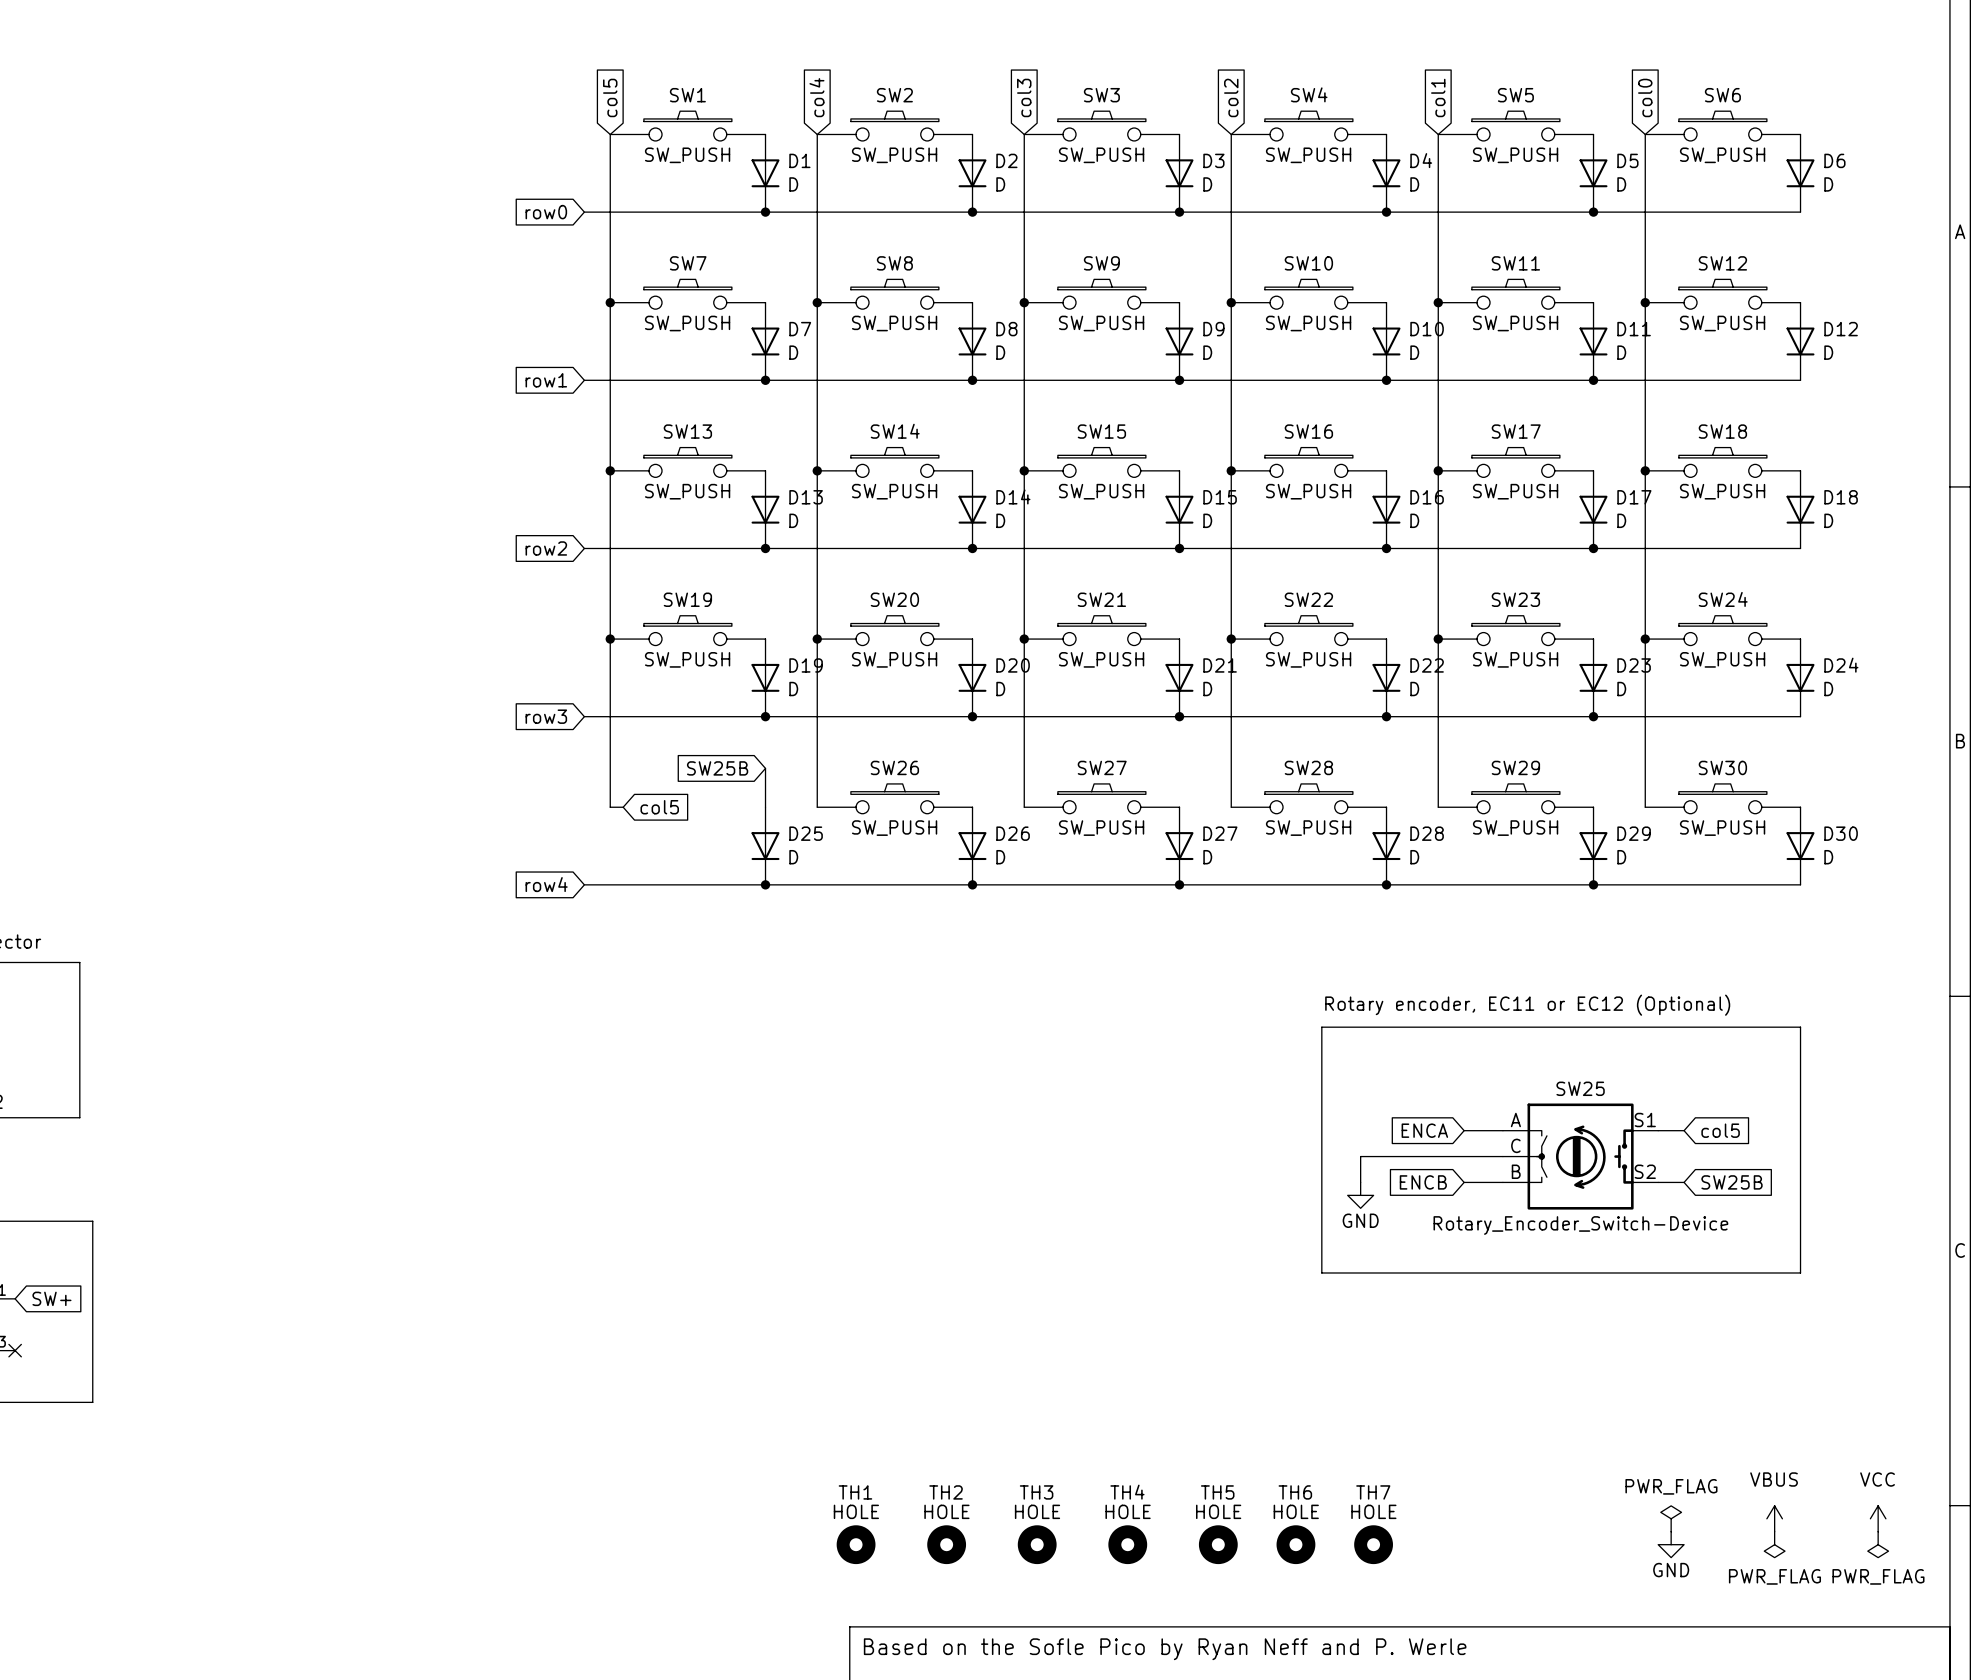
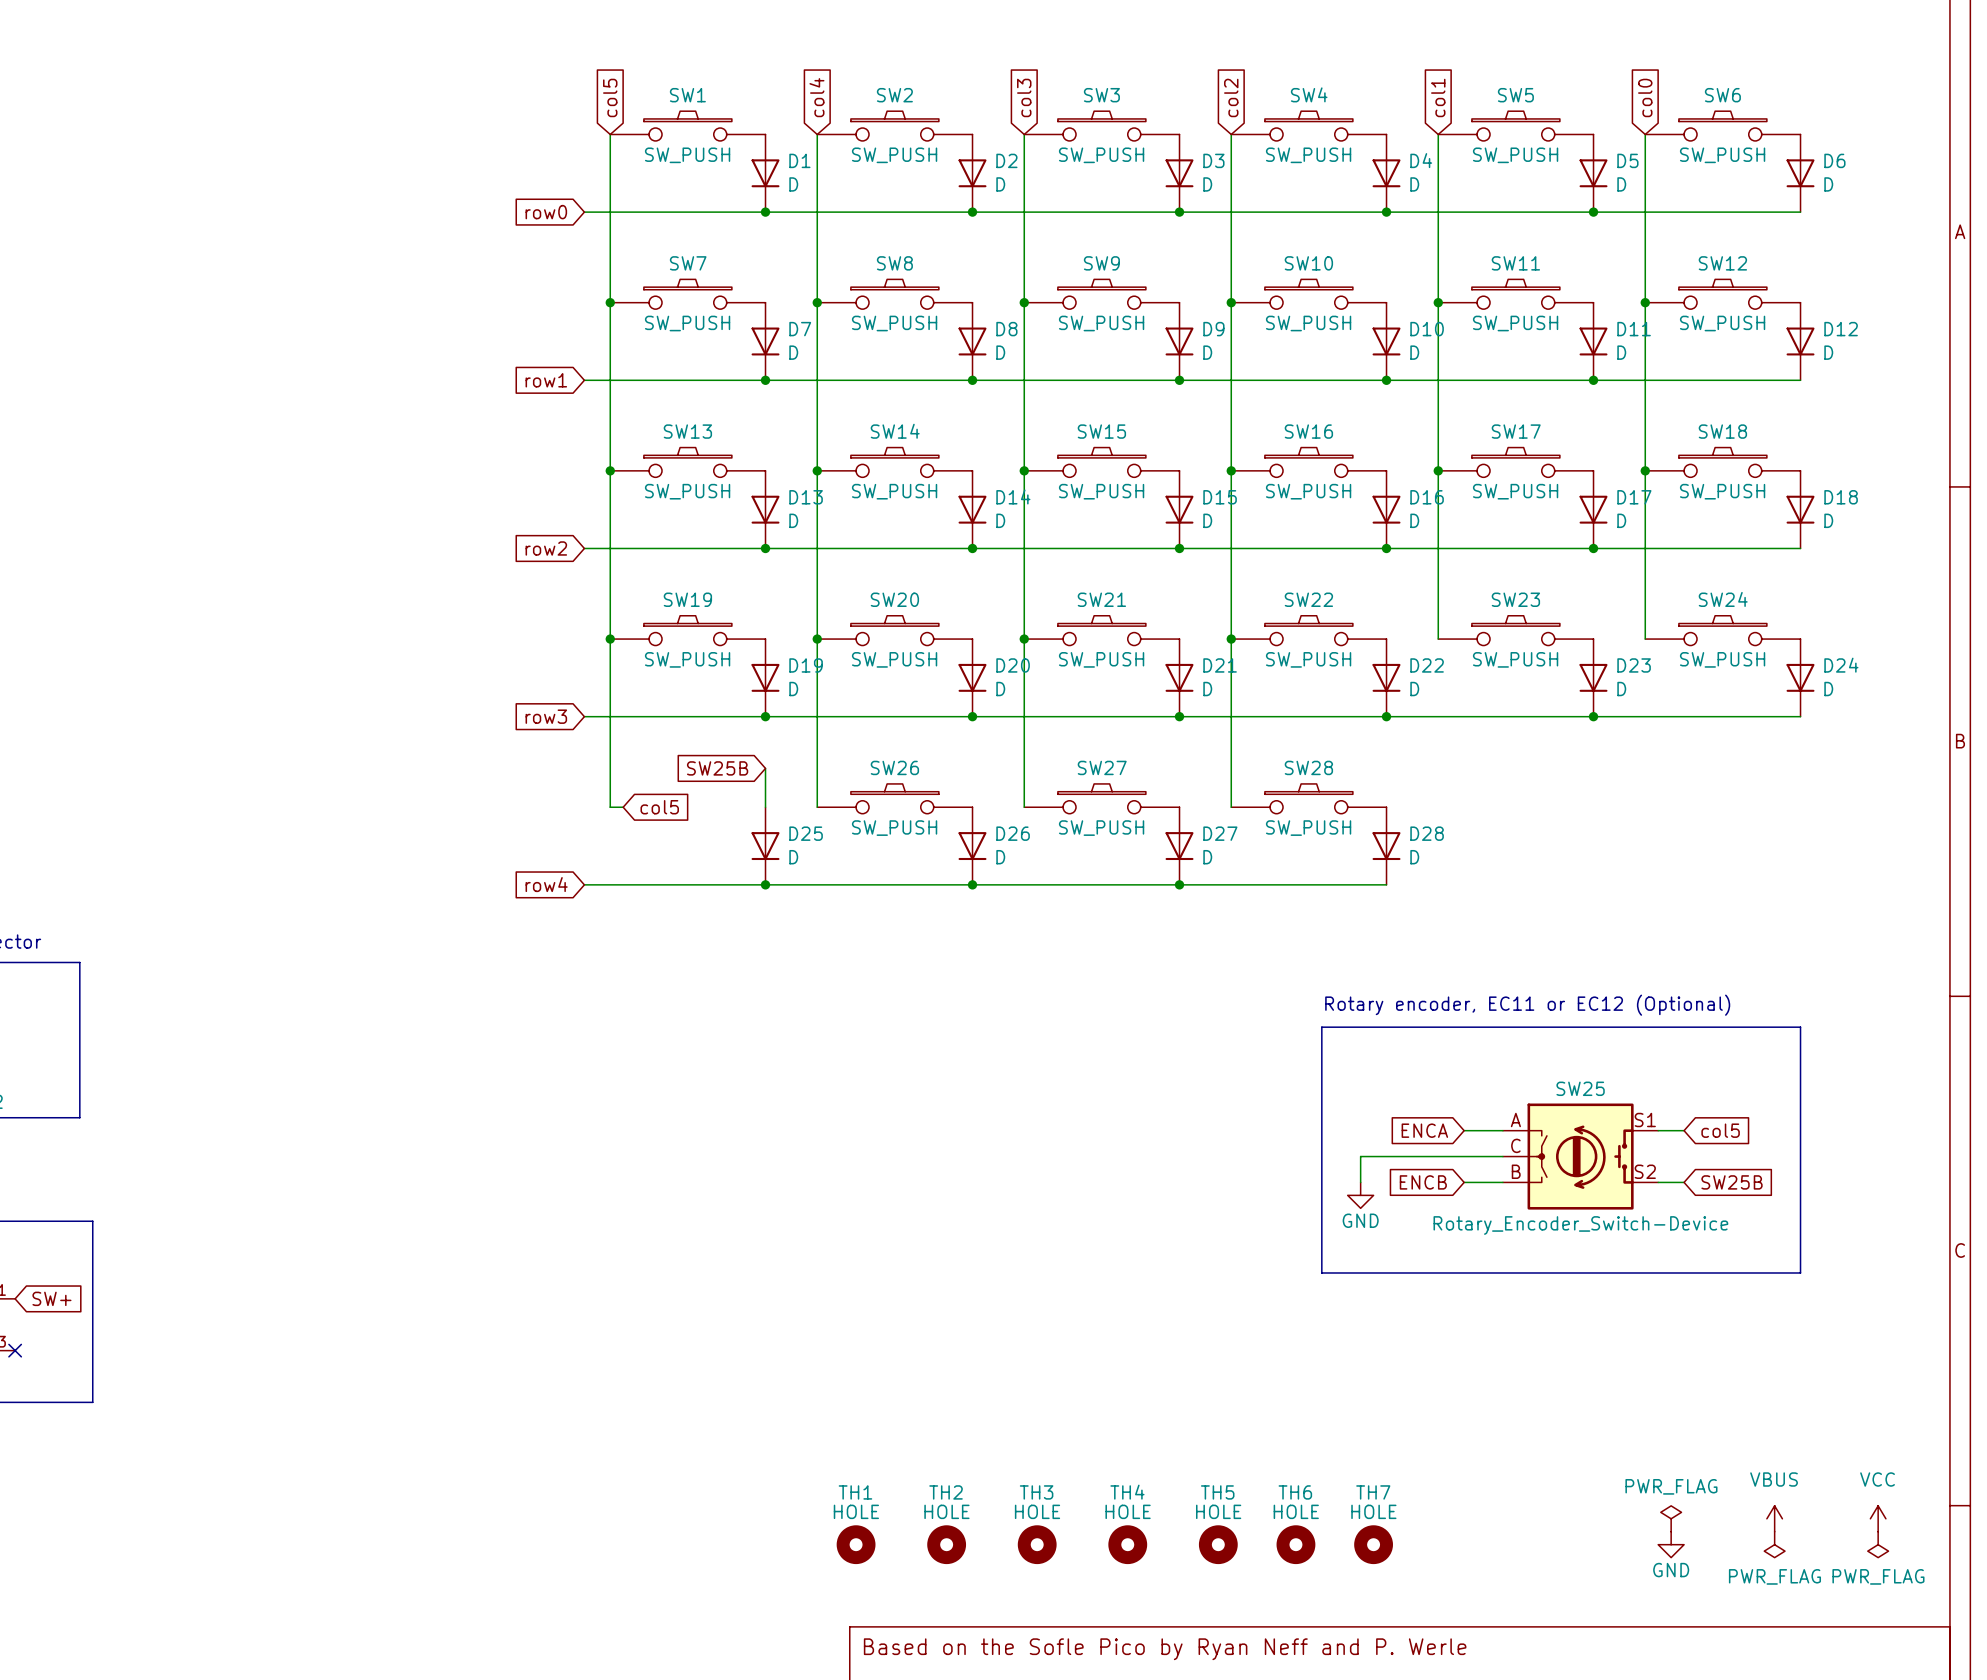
wire: (1438, 639) (1438, 807) -> none
junction: (1438, 639) -> none
wire: (1645, 639) (1645, 807) -> none
junction: (1645, 639) -> none
SW29: SW_PUSH (1515, 798) -> none
SW30: SW_PUSH (1722, 798) -> none
D29: D (1593, 846) -> none
D30: D (1800, 846) -> none
wire: (1386, 884) (1800, 884) -> none
junction: (1386, 884) -> none
junction: (1593, 884) -> none

